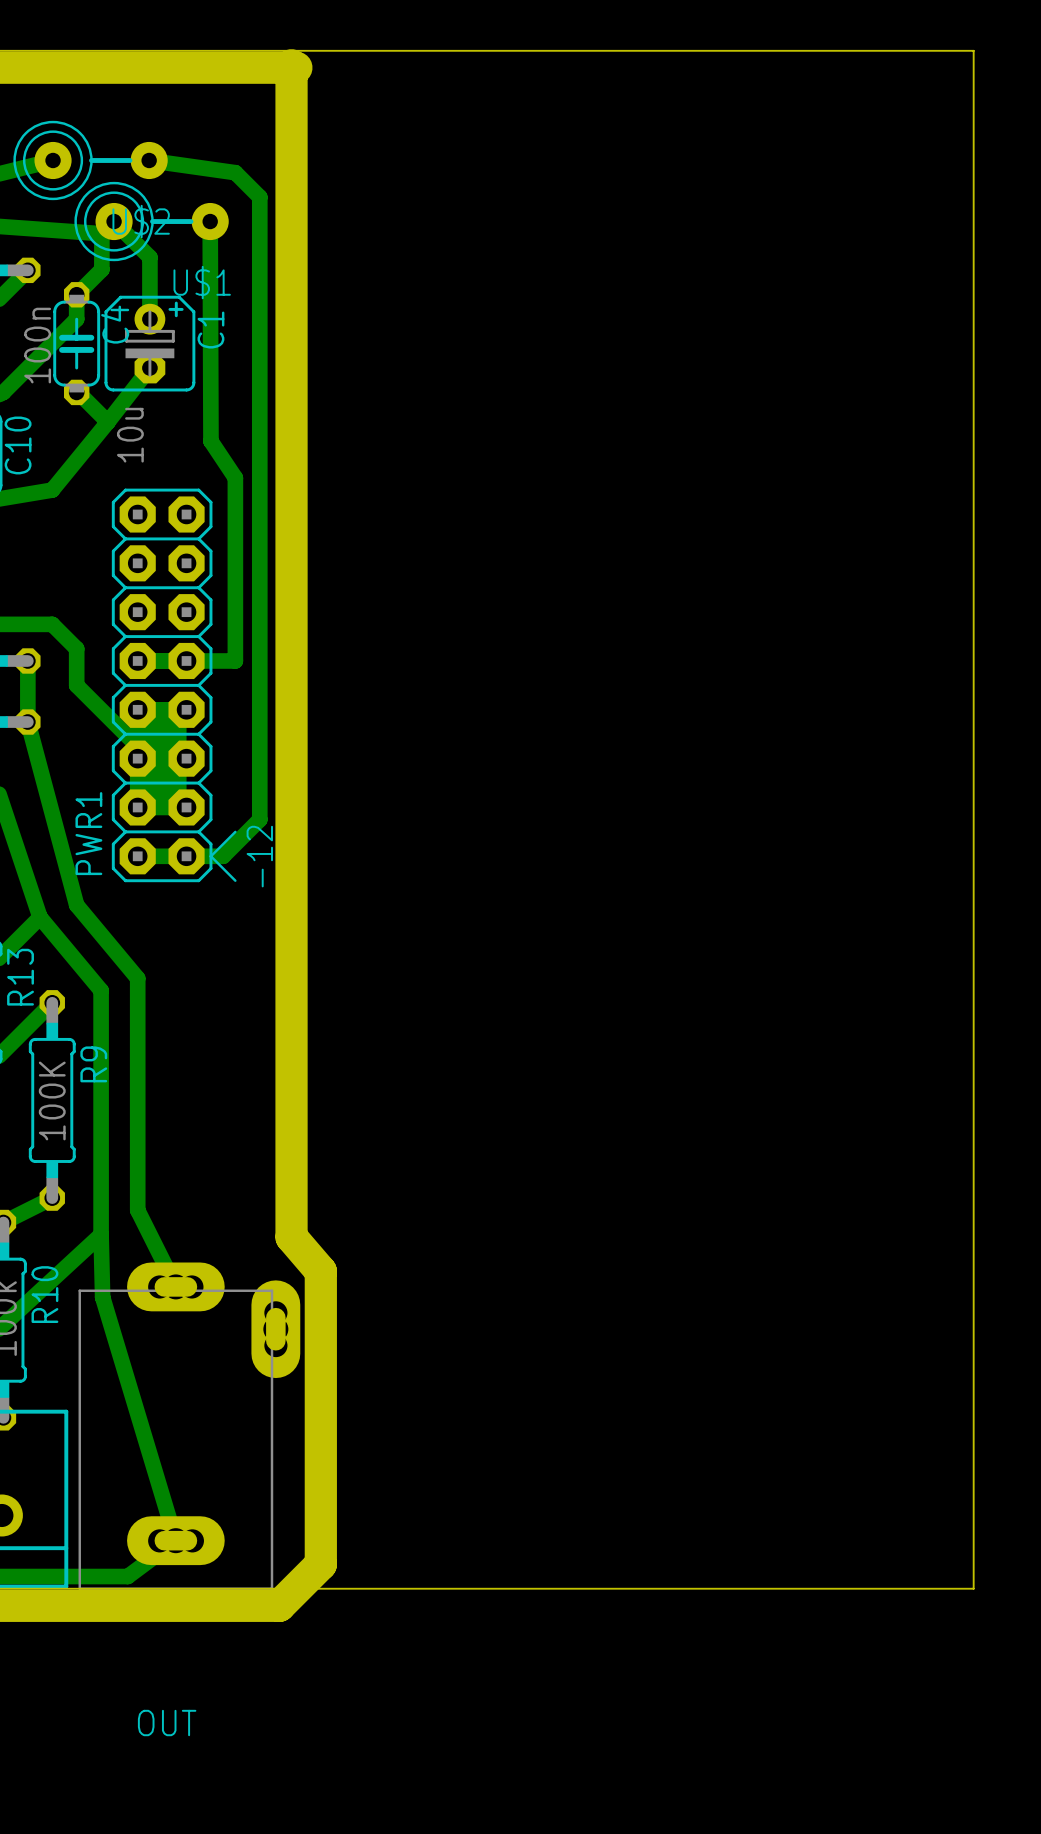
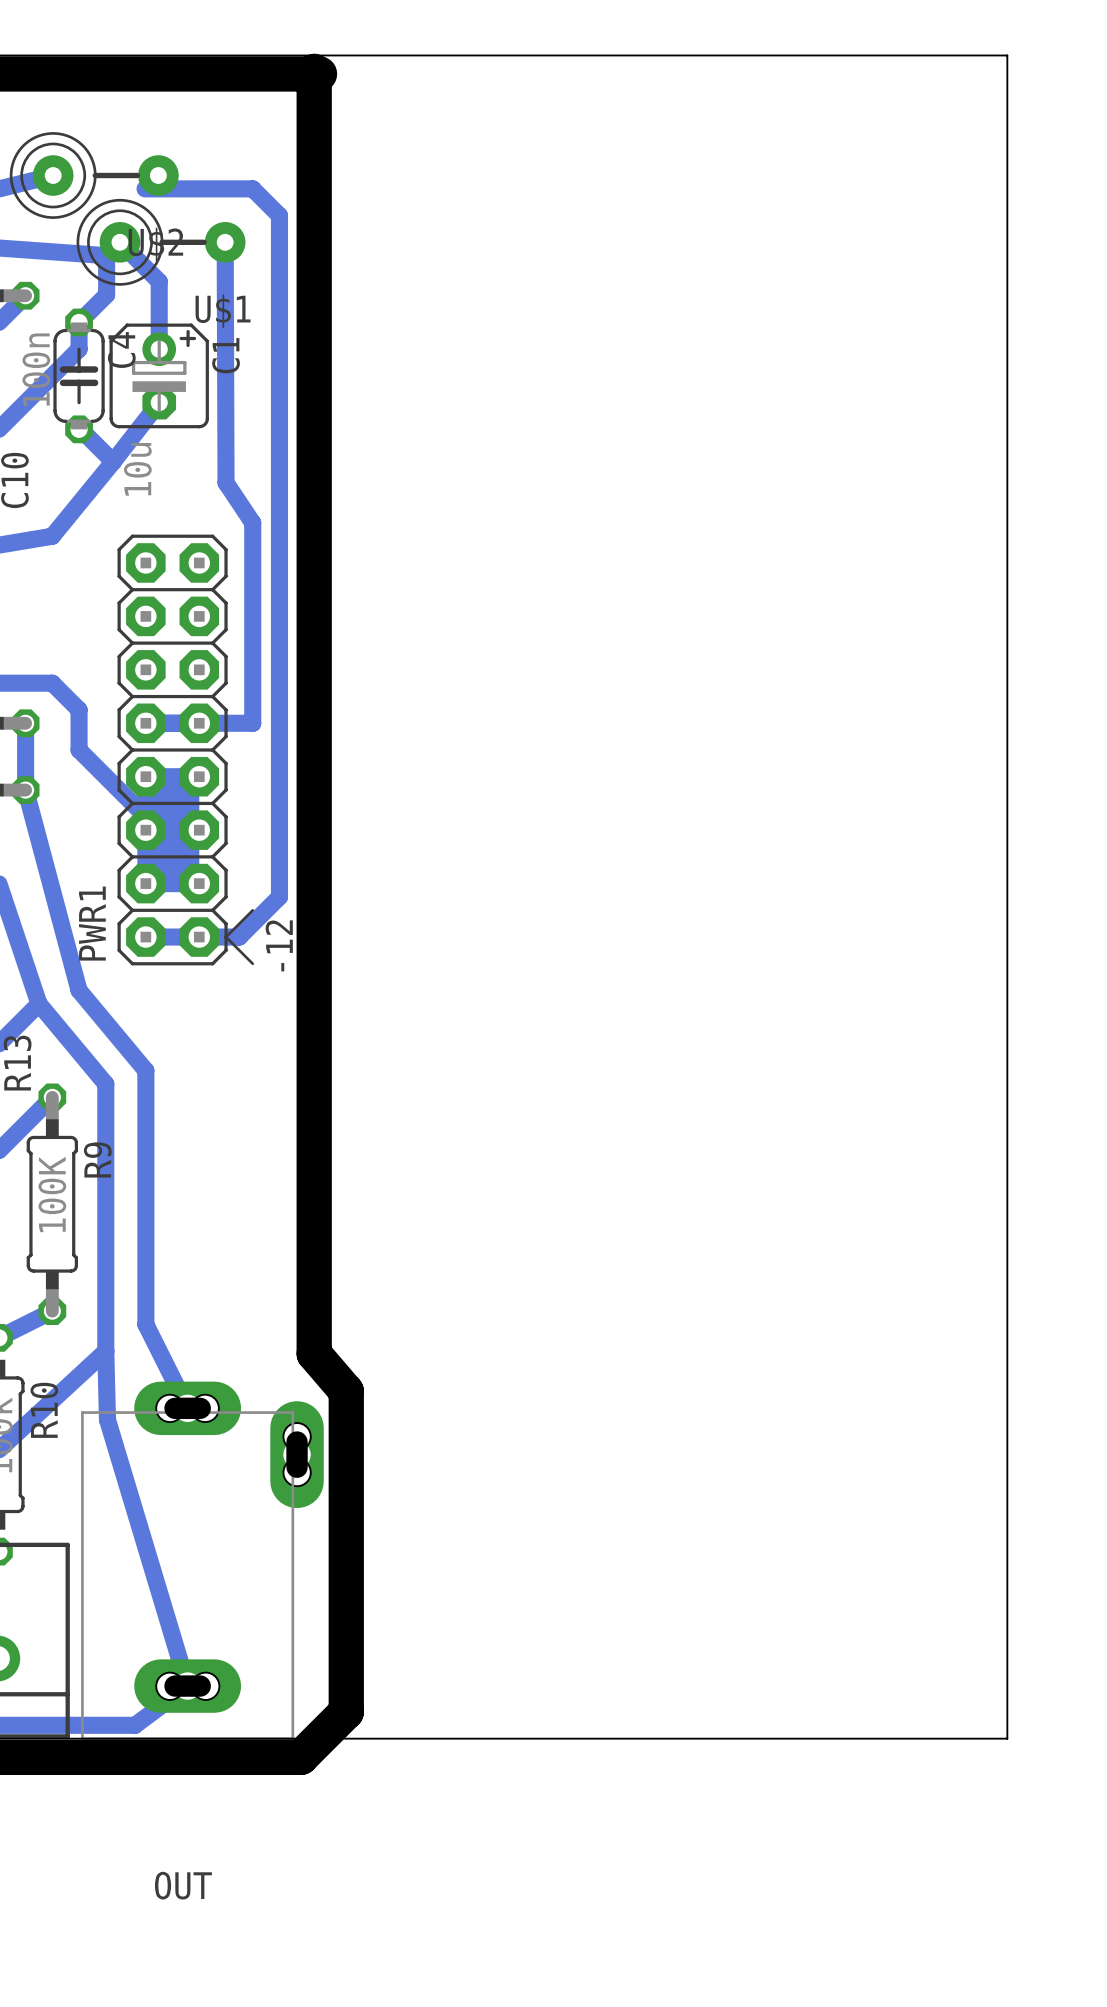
board edge: (924, 50) (973, 50) (973, 1588) (924, 1588) -> (1007, 55) (1007, 1738)
bottom track: (149, 160) (235, 172) -> (145, 188) (252, 188)

